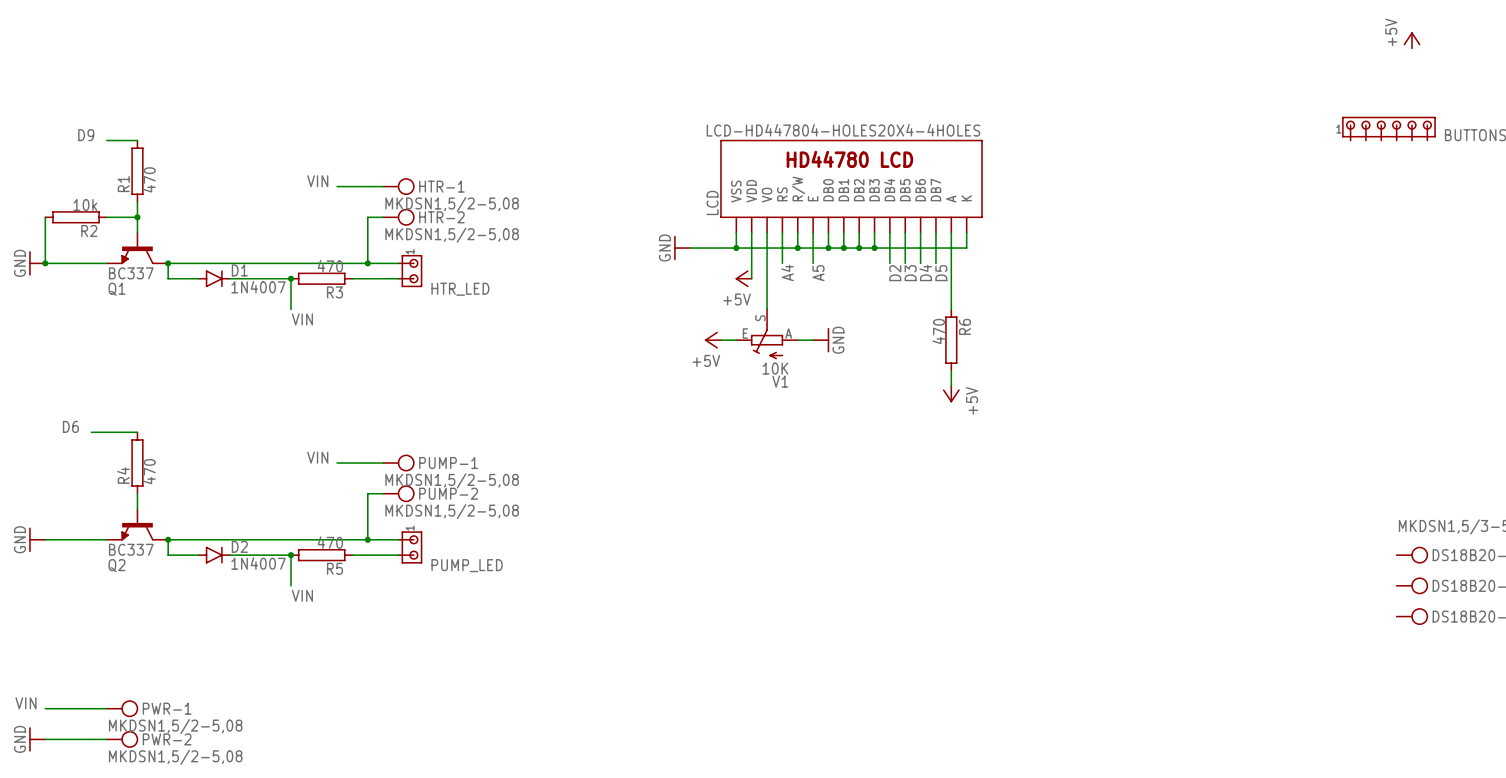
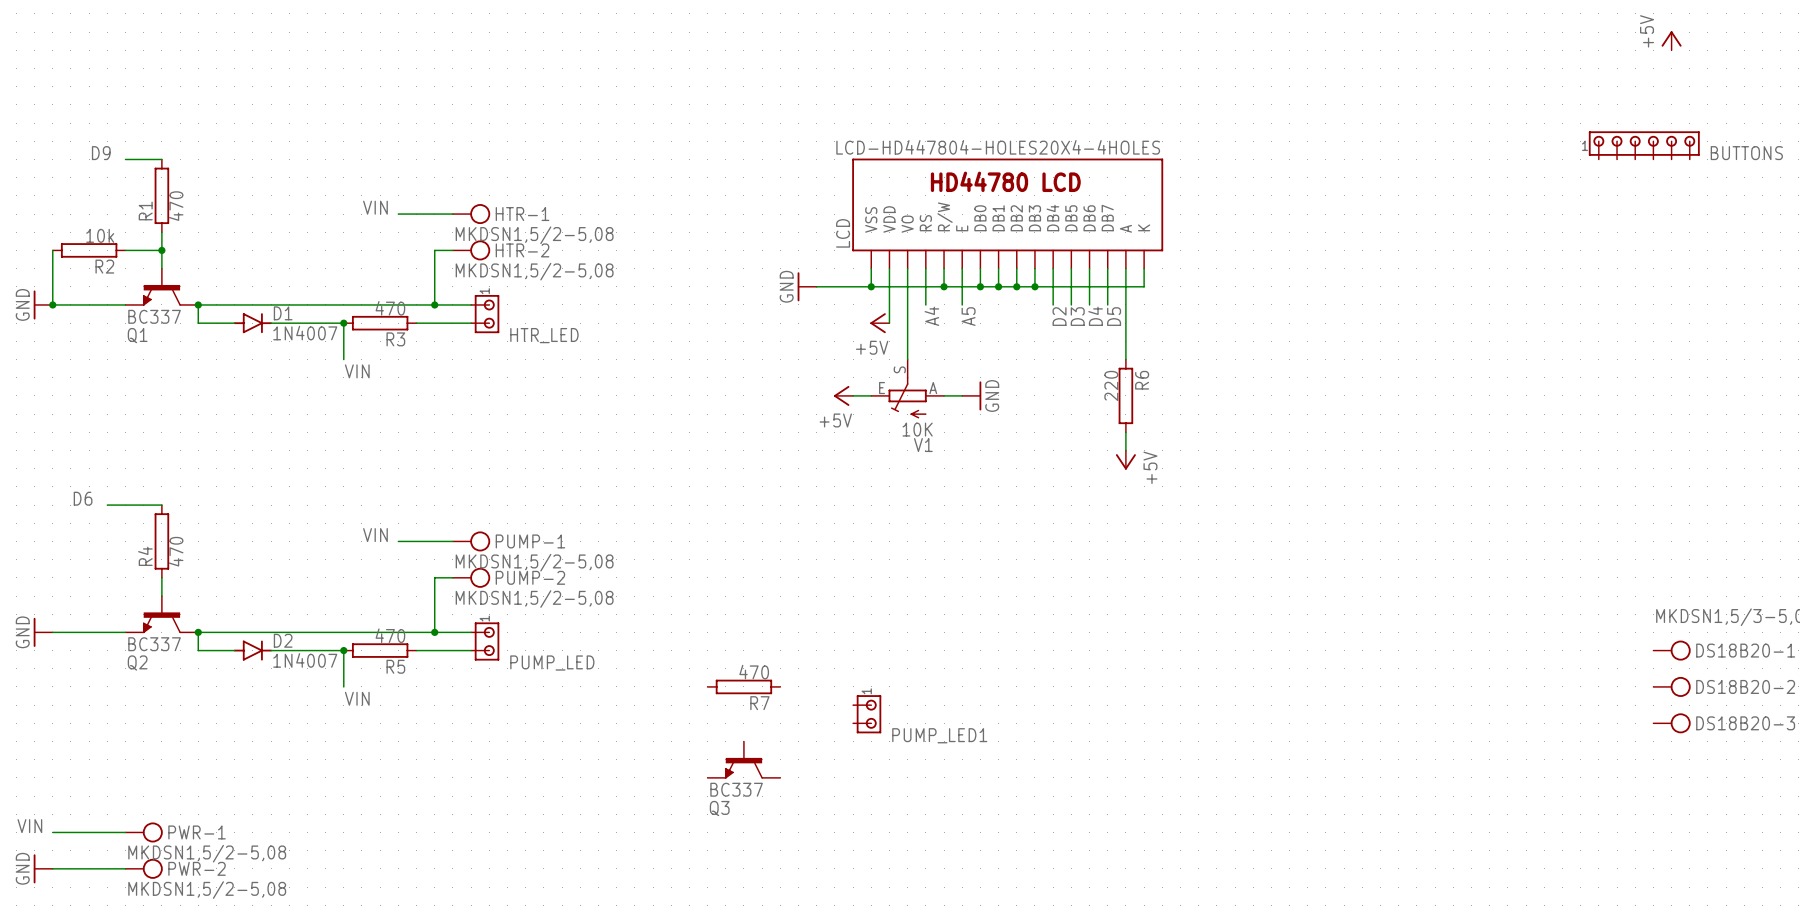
R6 value: 470 (938, 331) -> 220 (1111, 385)
R7: none -> 470 (743, 686)
PUMP_LED1: none -> (867, 714)
Q3: none -> BC337 (743, 759)

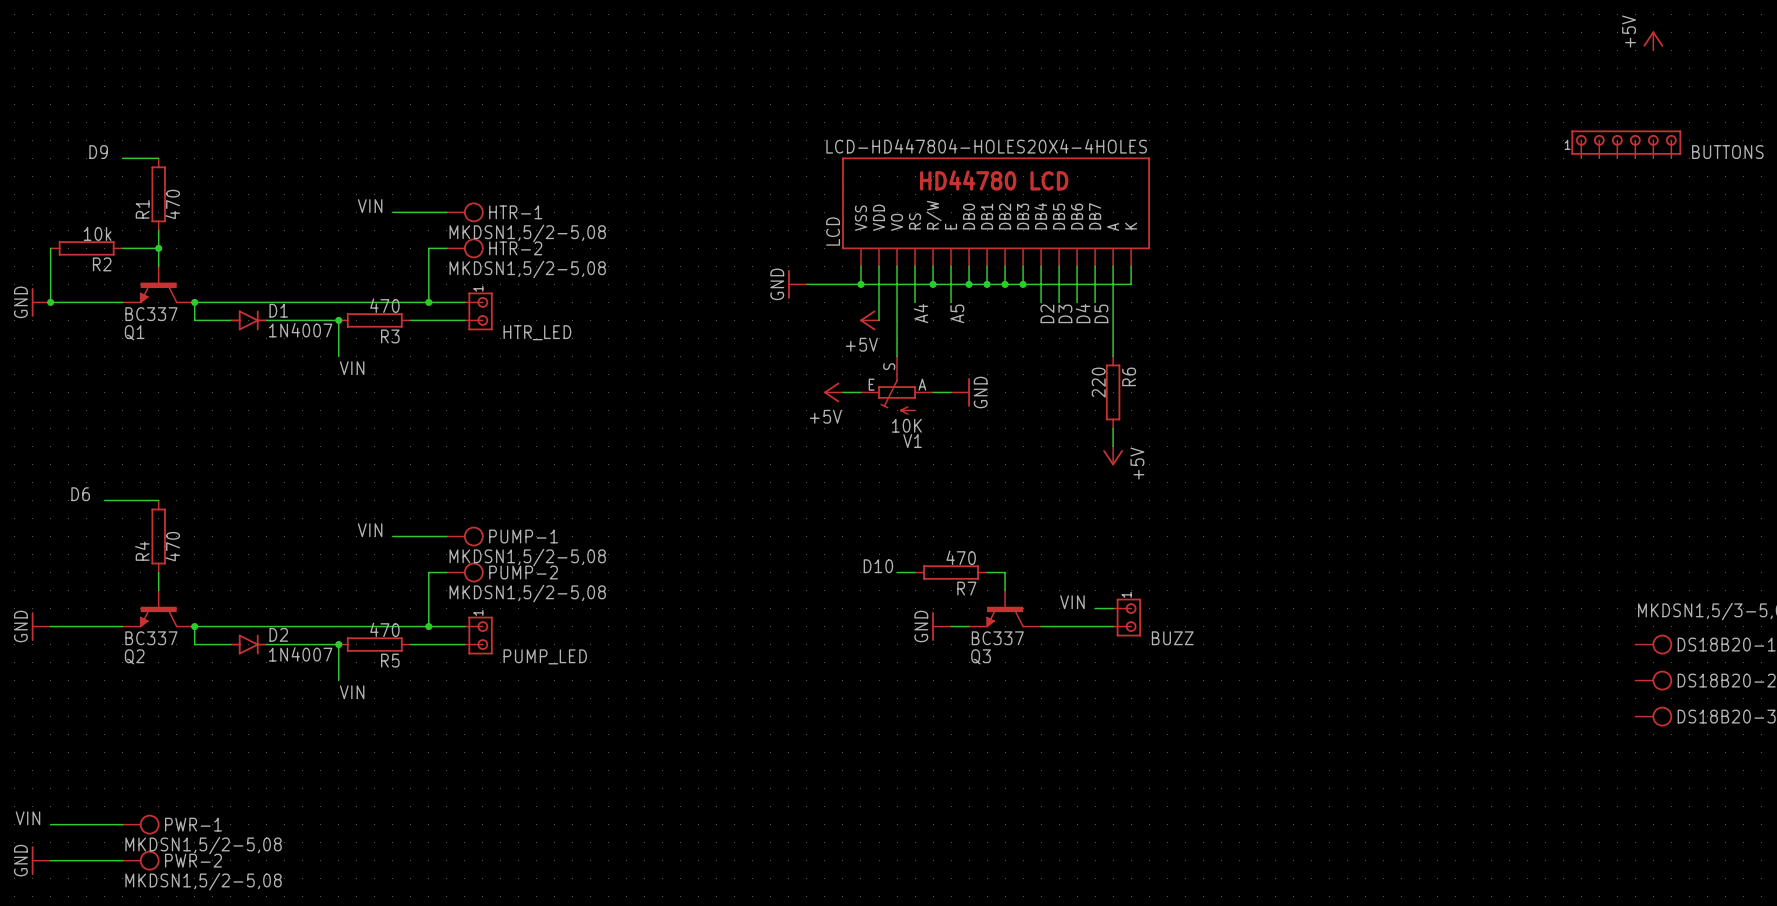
label: none -> D10 (878, 566)
wire: none -> (897, 572) (915, 572)
wire: none -> (987, 572) (1005, 572) (1005, 590)
label: none -> VIN (1072, 602)
wire: none -> (1095, 608) (1113, 608)
BUZZ: none -> (1127, 617)
power symbol: none -> GND (941, 626)
wire: none -> (951, 626) (969, 626)
wire: none -> (1041, 626) (1113, 626)
R7 position: (743, 686) -> (951, 572)
PUMP_LED1: (867, 714) -> none
Q3 position: (743, 759) -> (1005, 608)

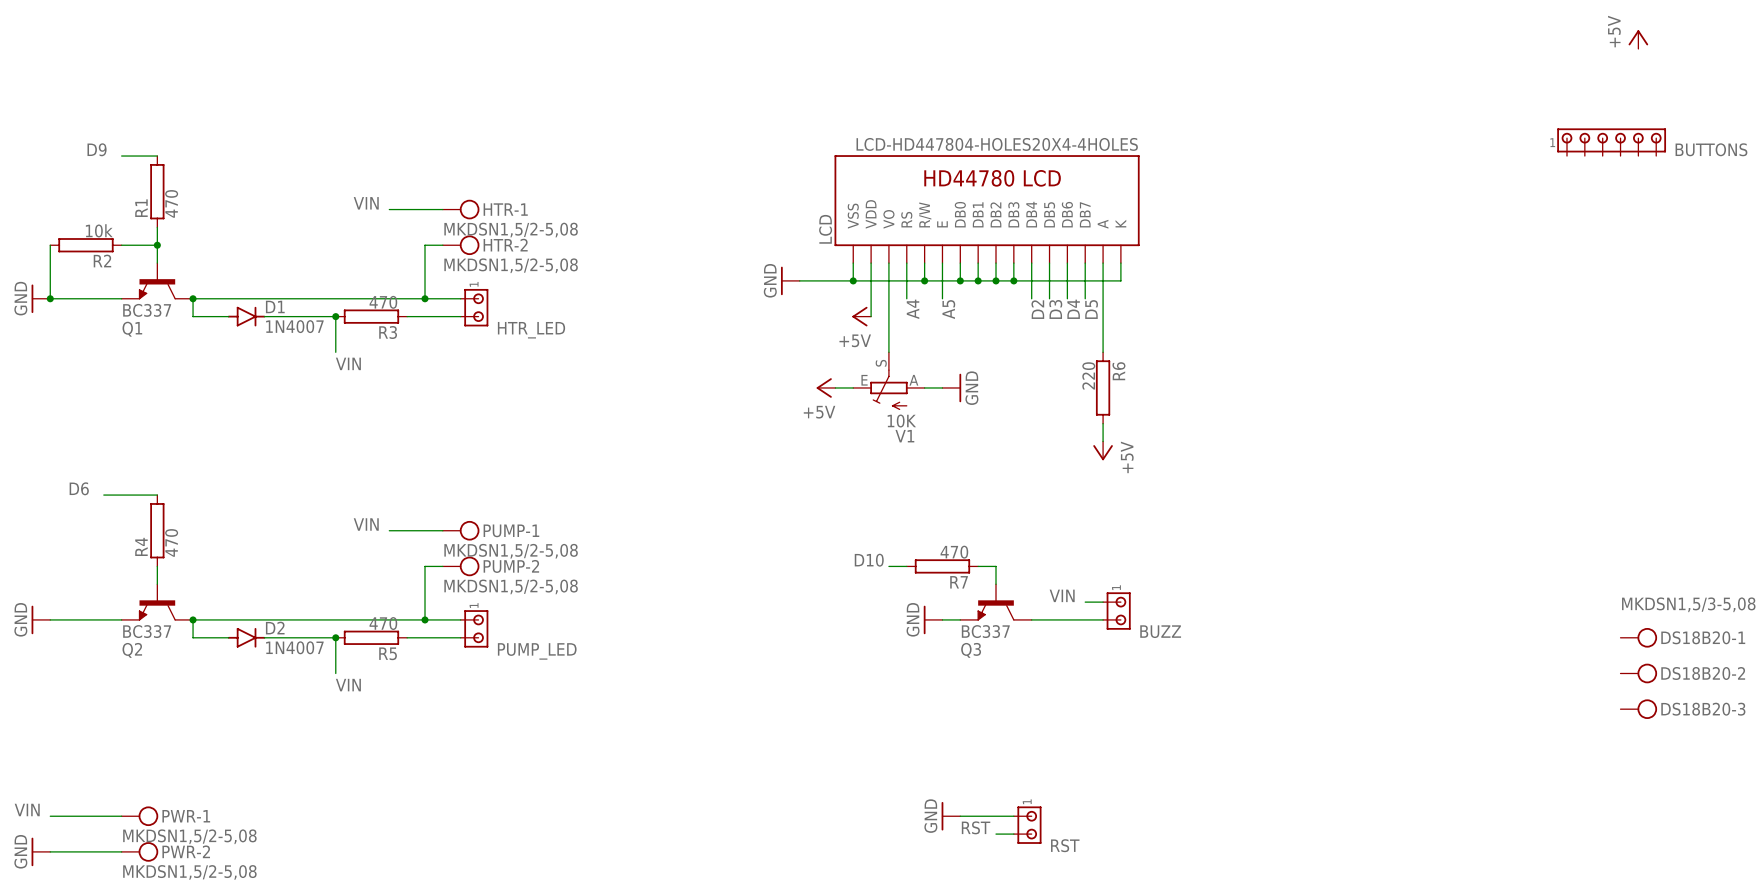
power symbol: none -> GND (950, 816)
wire: none -> (960, 816) (1013, 816)
RST: none -> (1027, 825)
label: none -> RST (976, 827)
wire: none -> (996, 834) (1013, 834)

